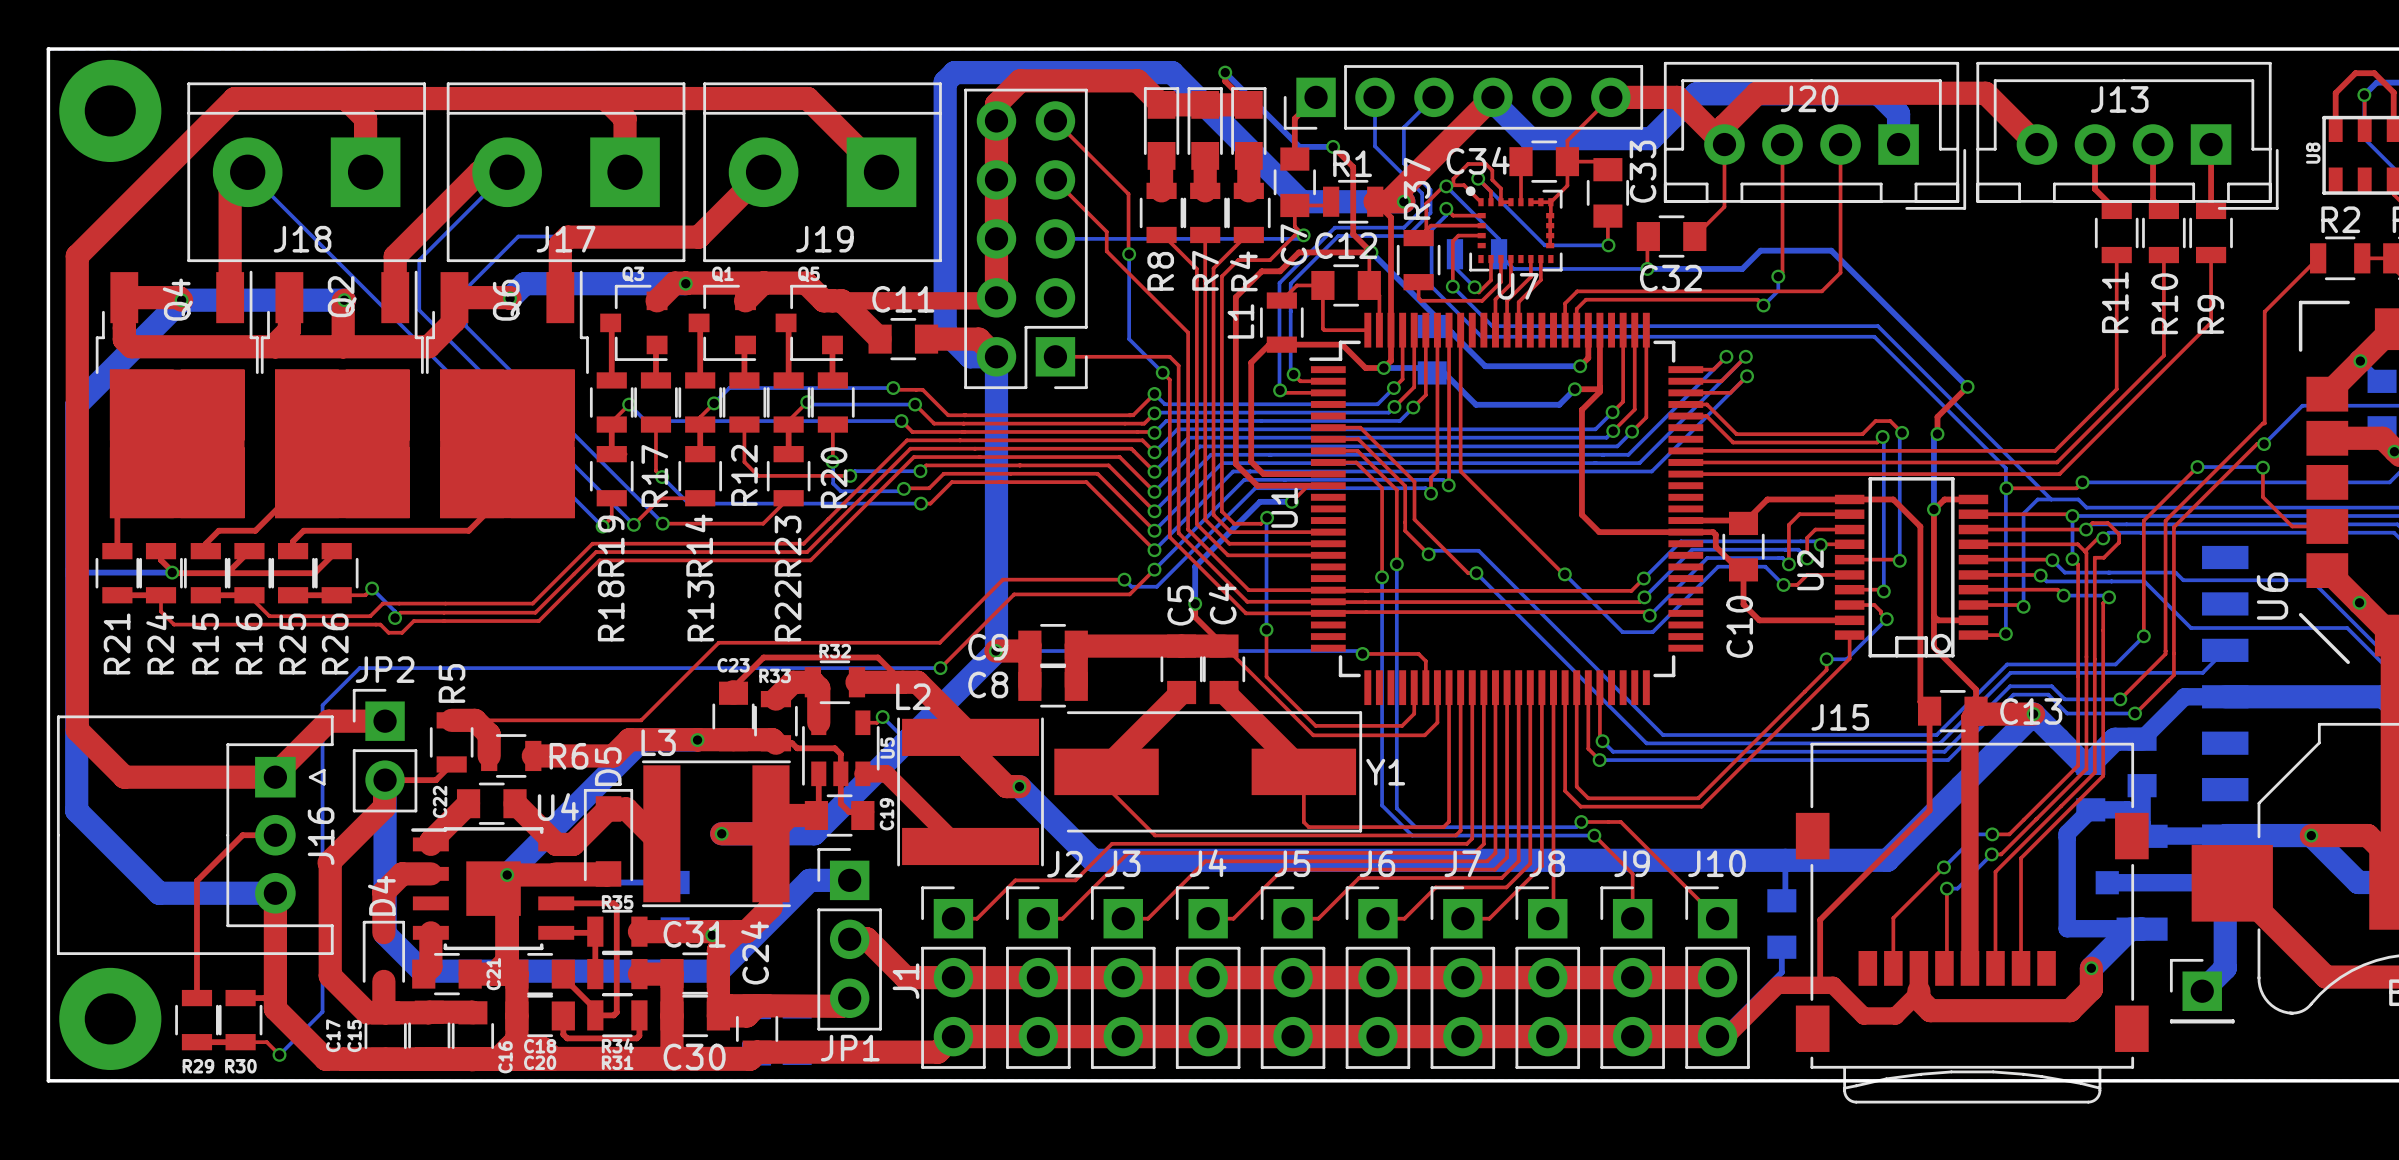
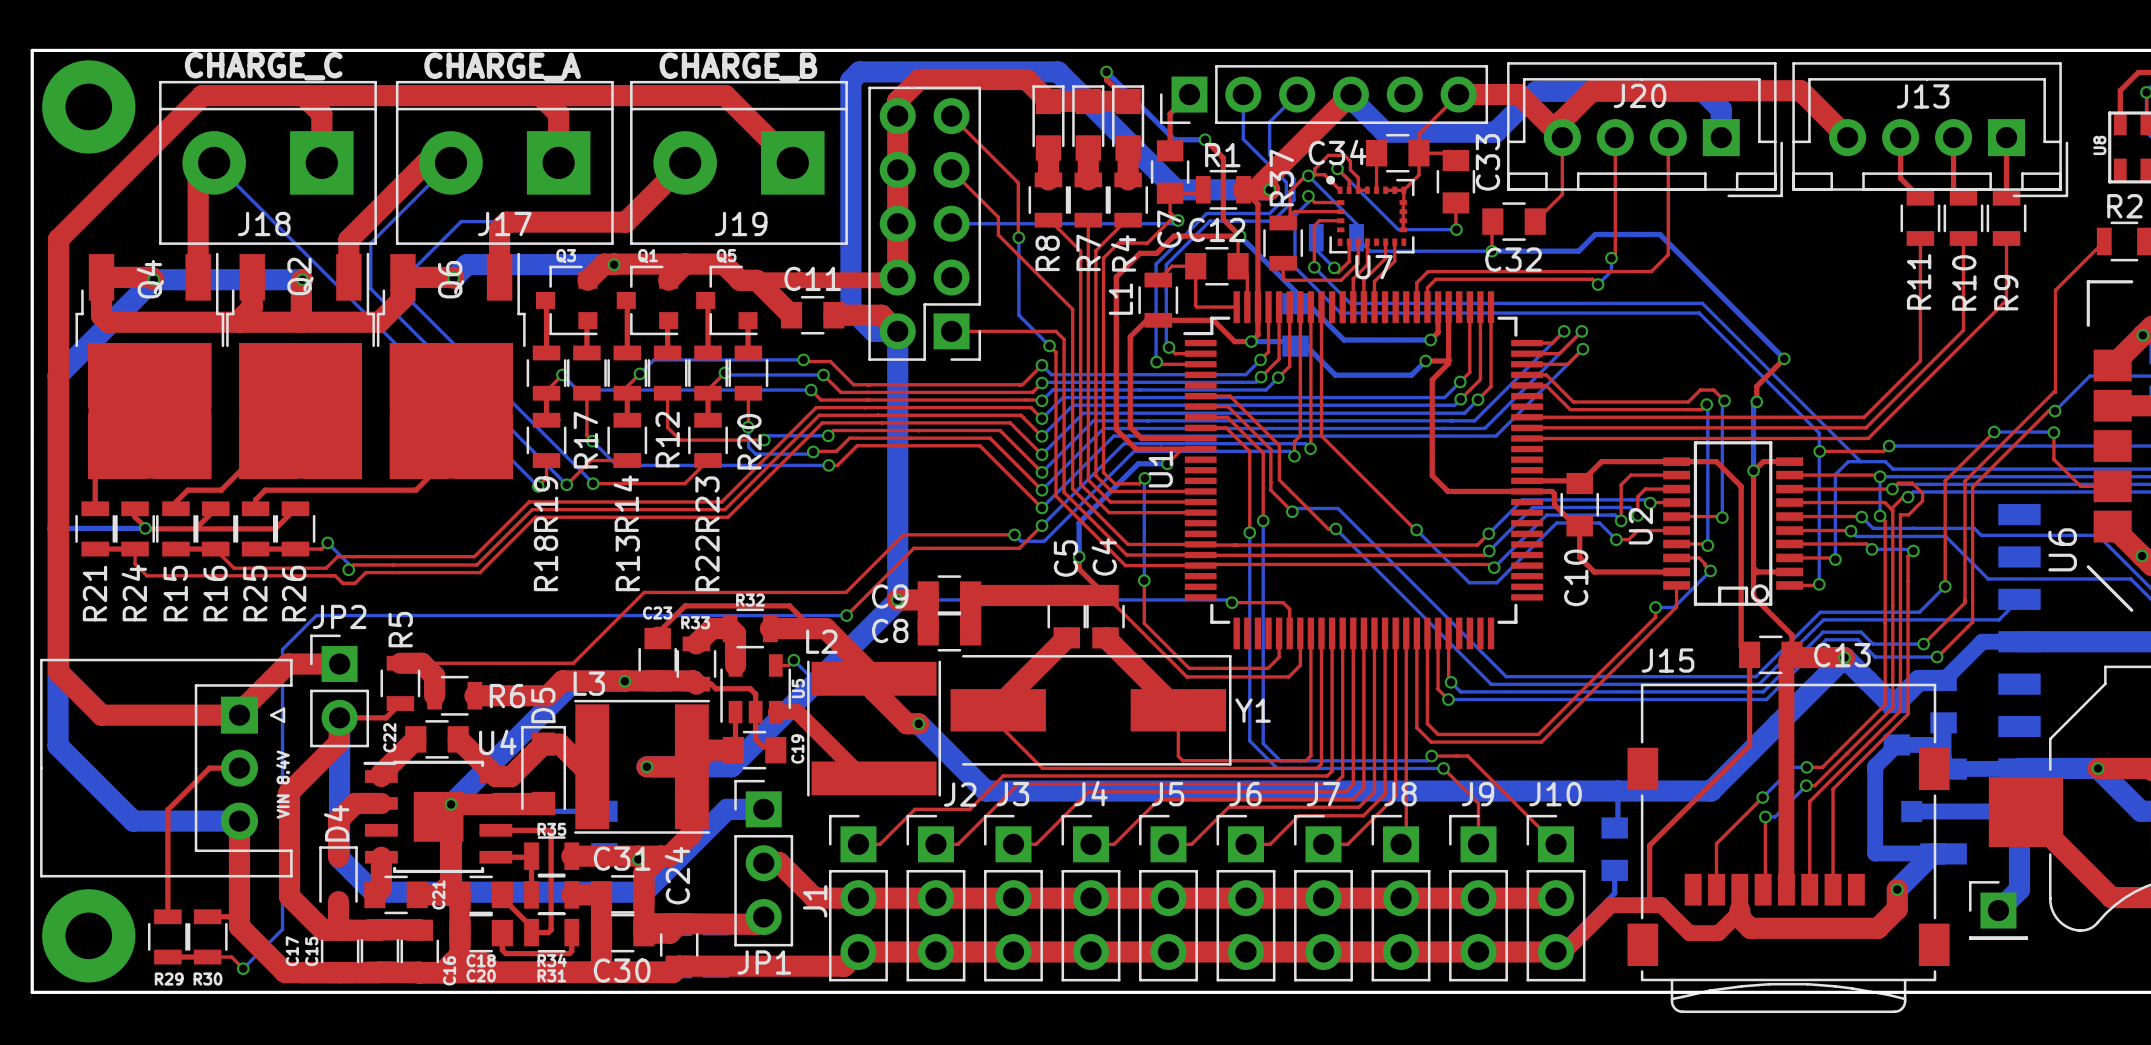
text: none -> CHARGE_C (263, 66)
text: none -> CHARGE_A (502, 66)
text: none -> CHARGE_B (738, 66)
J16 name: J16 (321, 836) -> none
text: none -> VIN 8.4V (282, 784)

